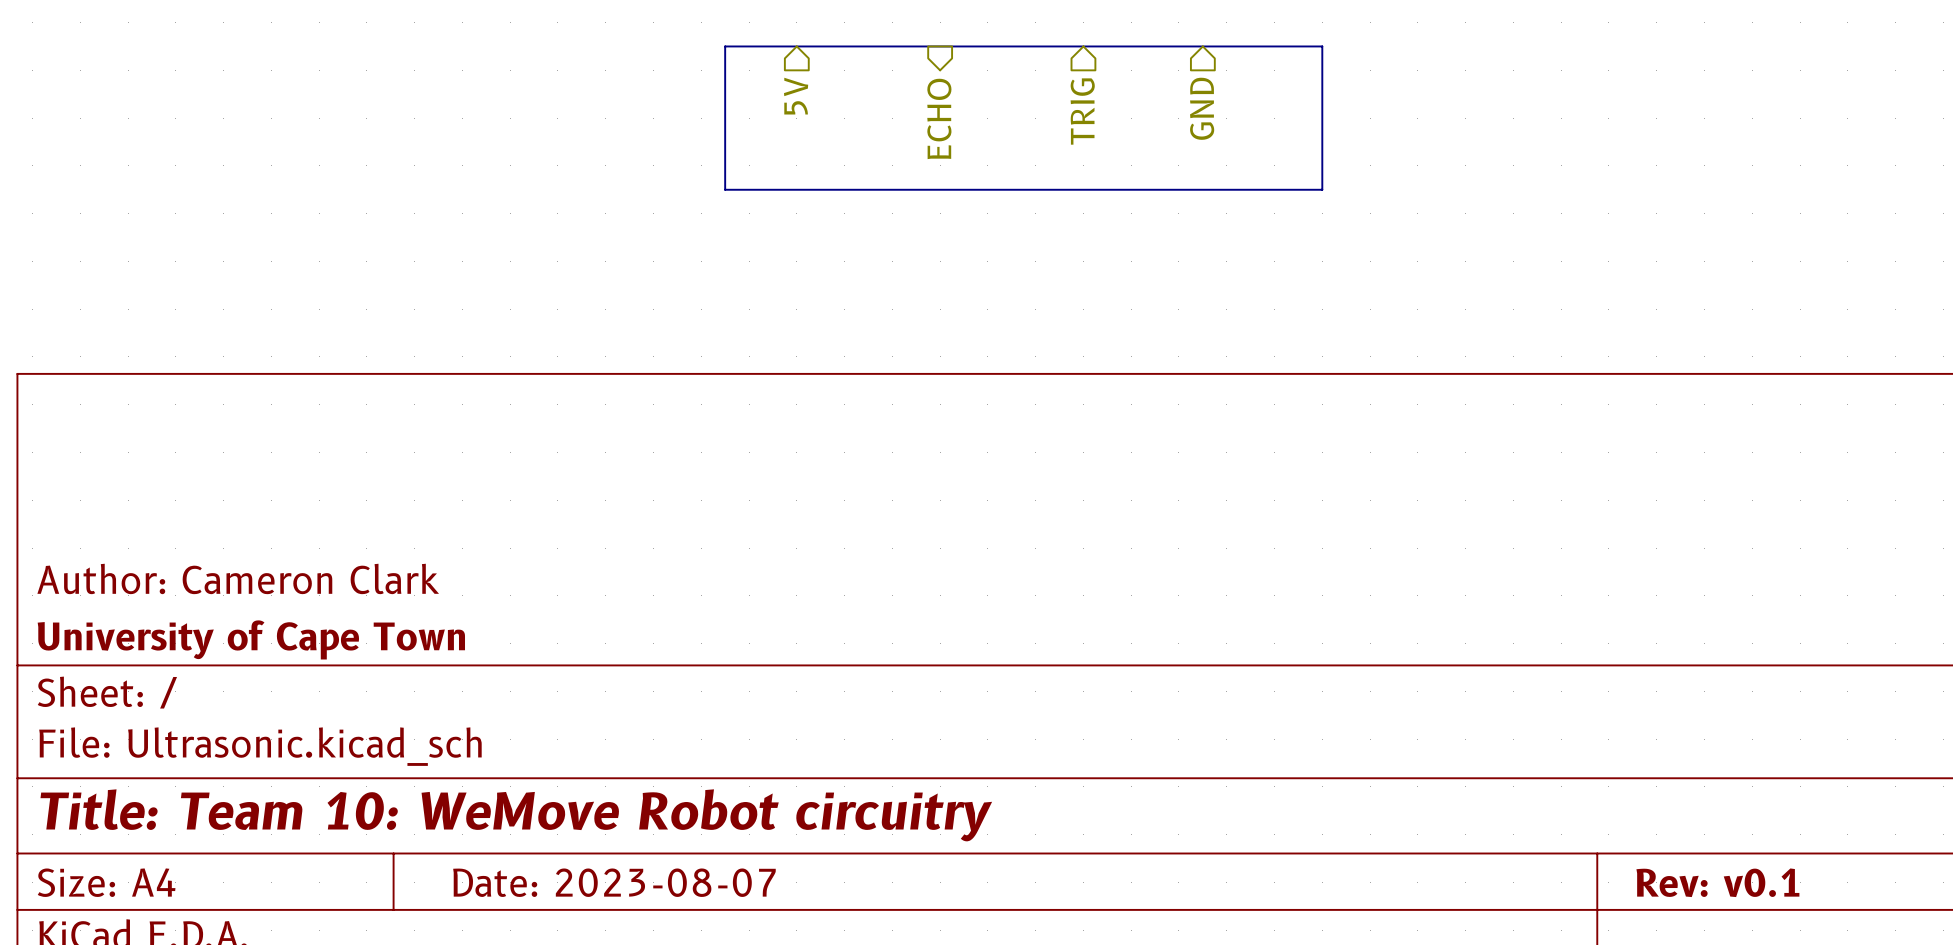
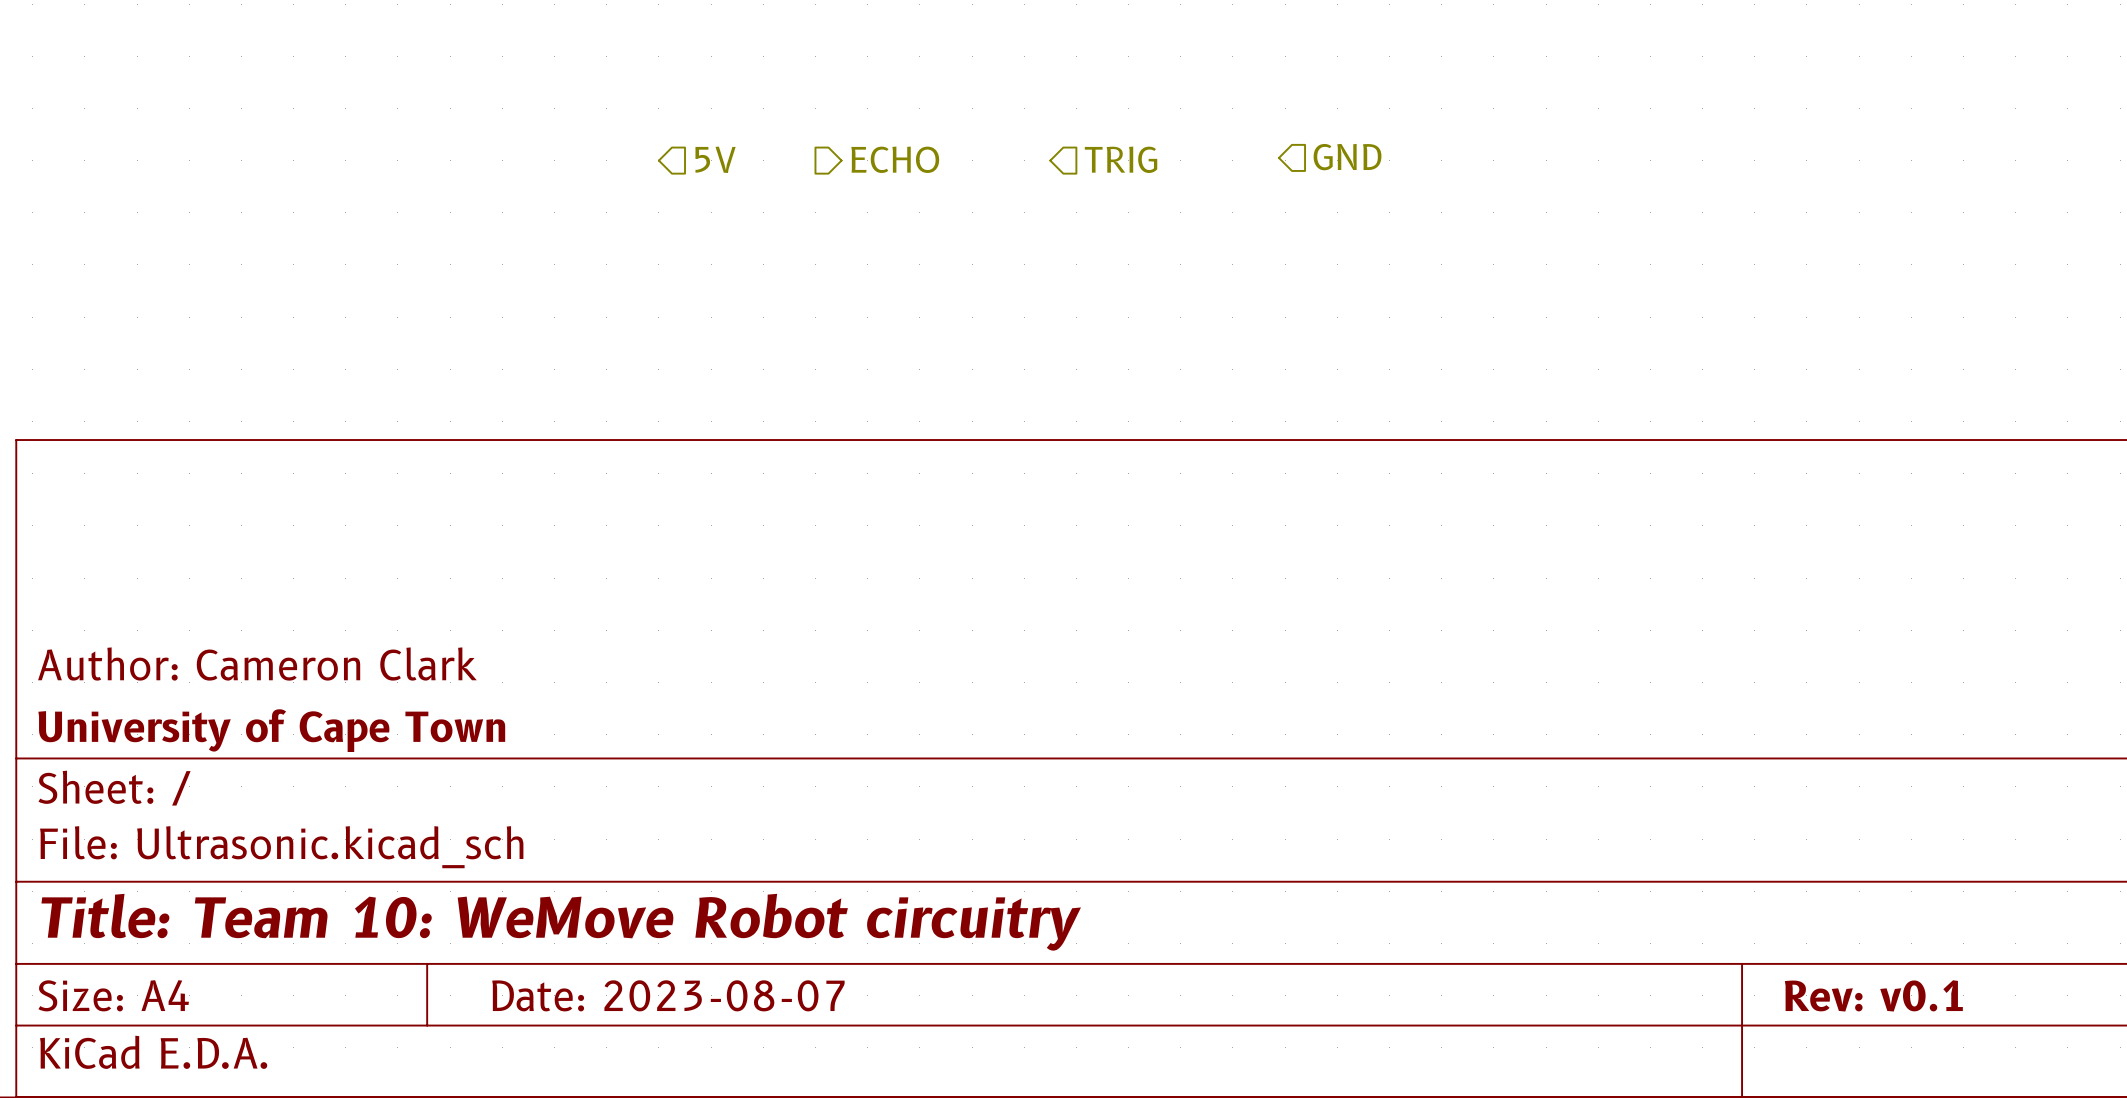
line: (725, 46) (1322, 46) (1322, 189) (725, 189) (725, 46) -> none
hierarchical label rotation: 0° (796, 96) -> 90° counterclockwise (715, 159)
hierarchical label position: 5V (796, 96) -> 5V (715, 159)
hierarchical label rotation: 0° (1202, 108) -> 90° counterclockwise (1347, 157)
hierarchical label rotation: 0° (1082, 111) -> 90° counterclockwise (1121, 159)
hierarchical label rotation: 0° (939, 118) -> 90° counterclockwise (895, 159)

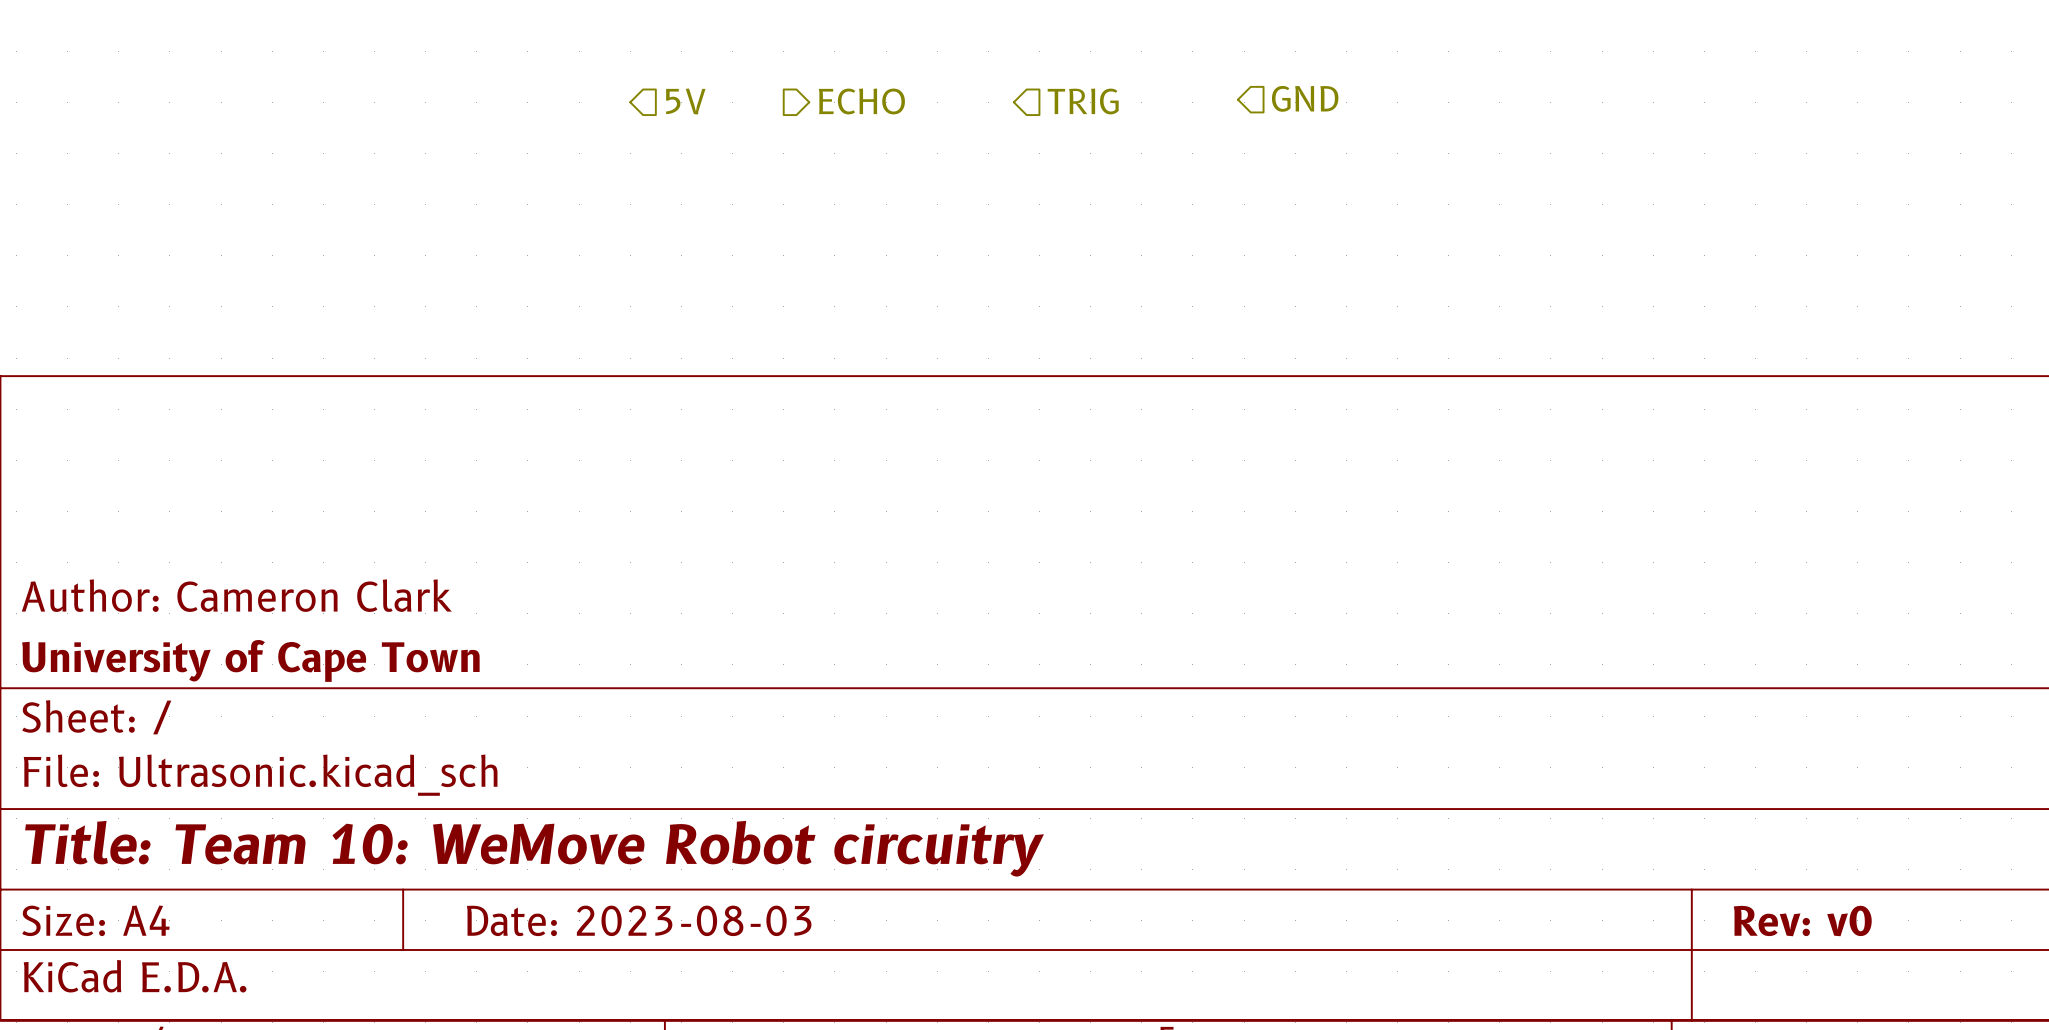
title block: Date: 2023-08-07 (668, 995) -> Date: 2023-08-03 (639, 920)
title block: Rev: v0.1 (1873, 995) -> Rev: v0 (1802, 921)

